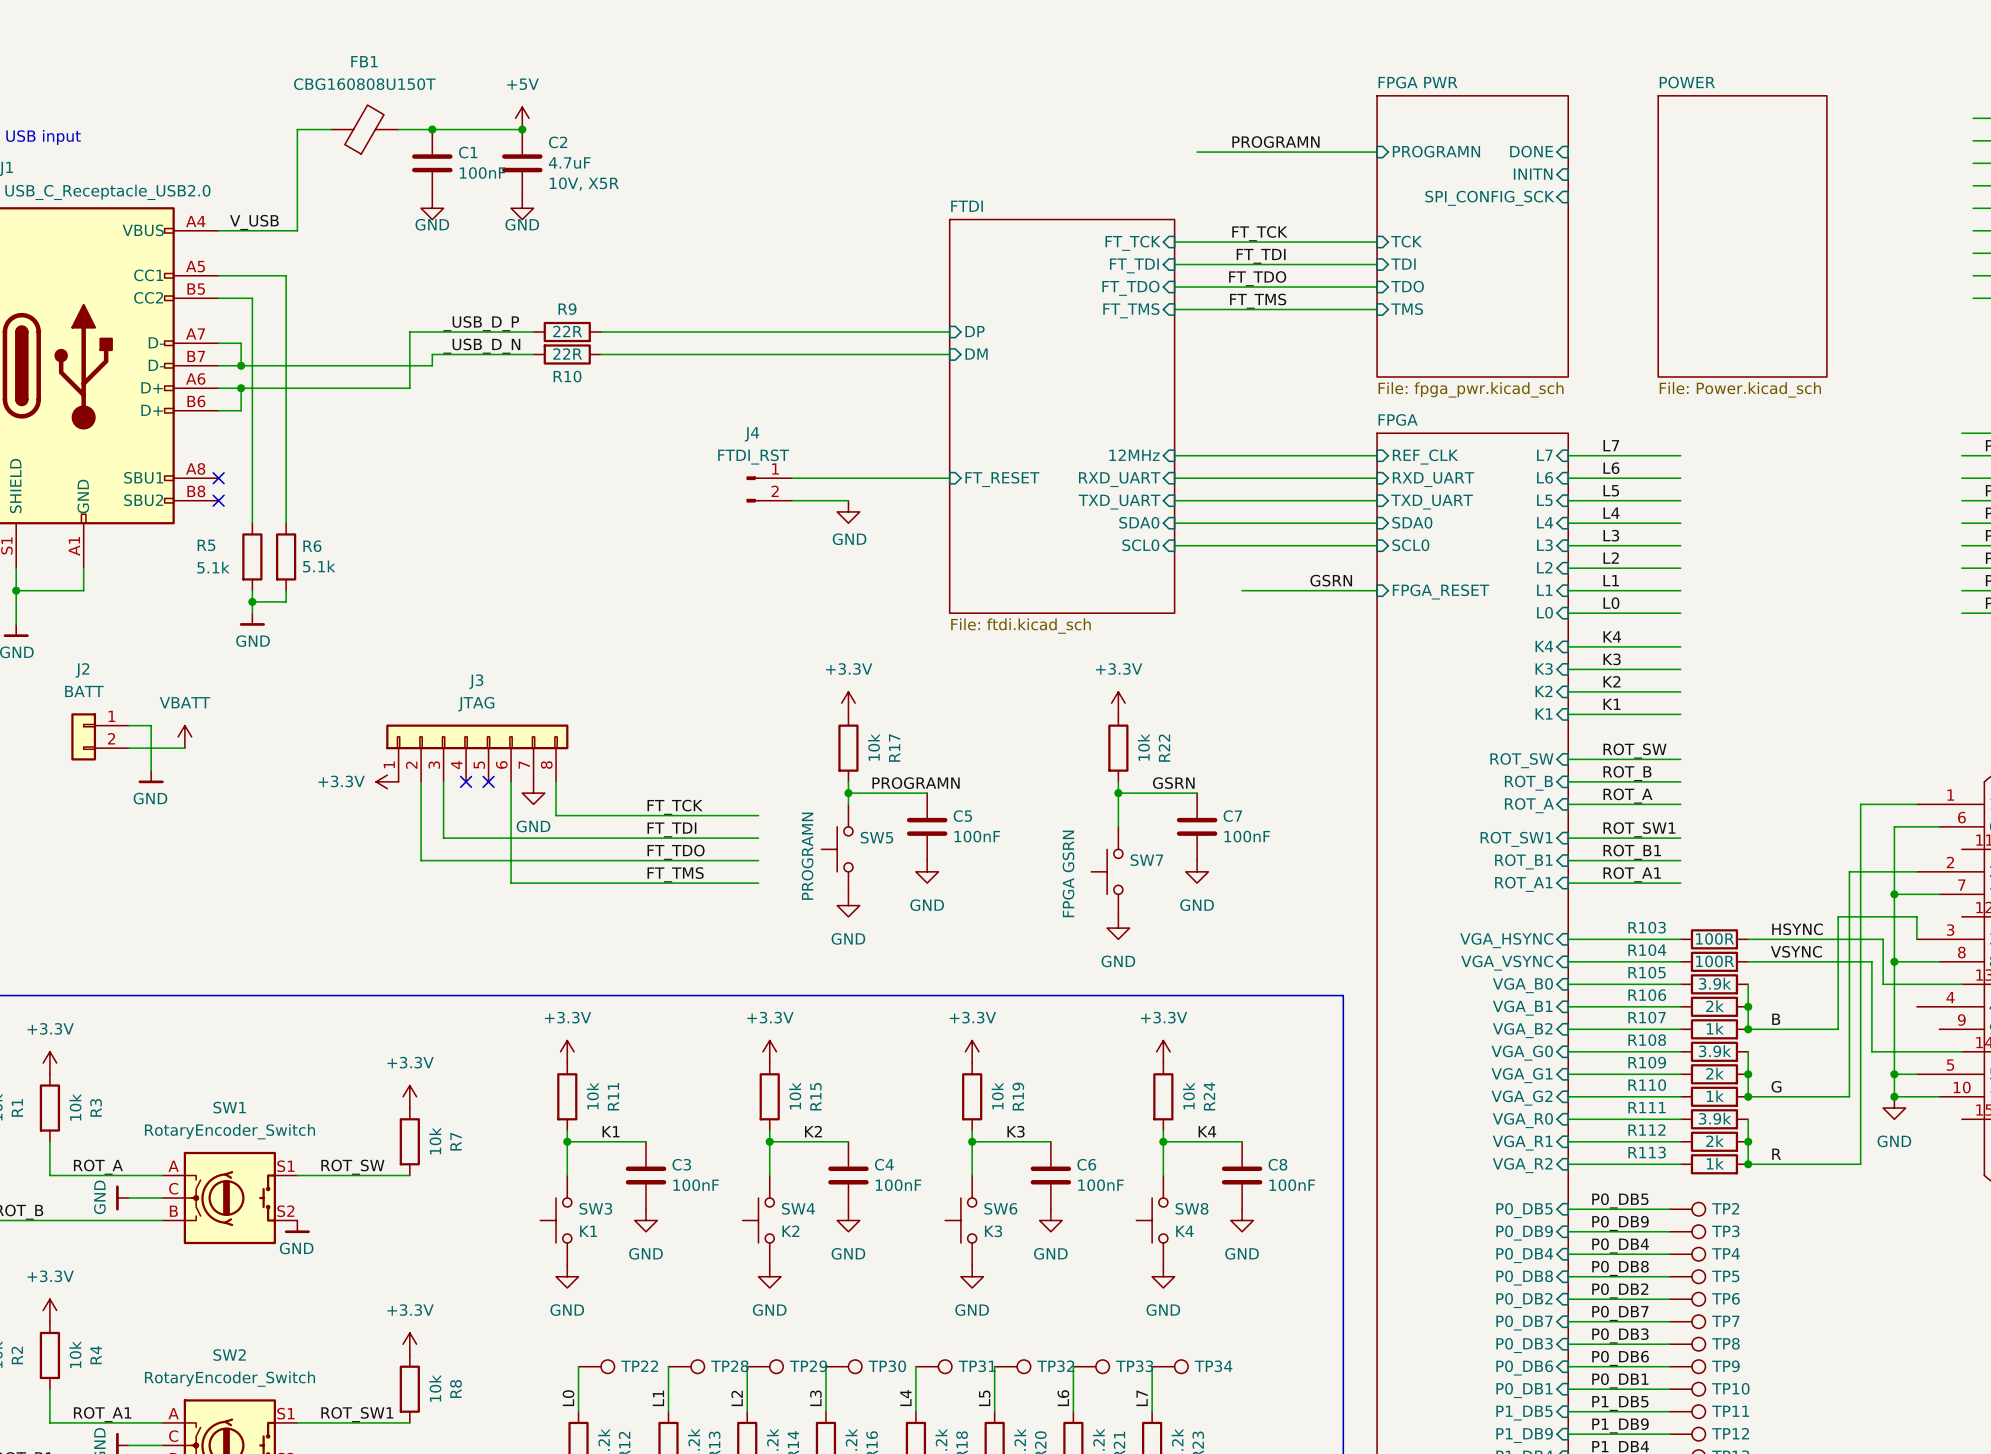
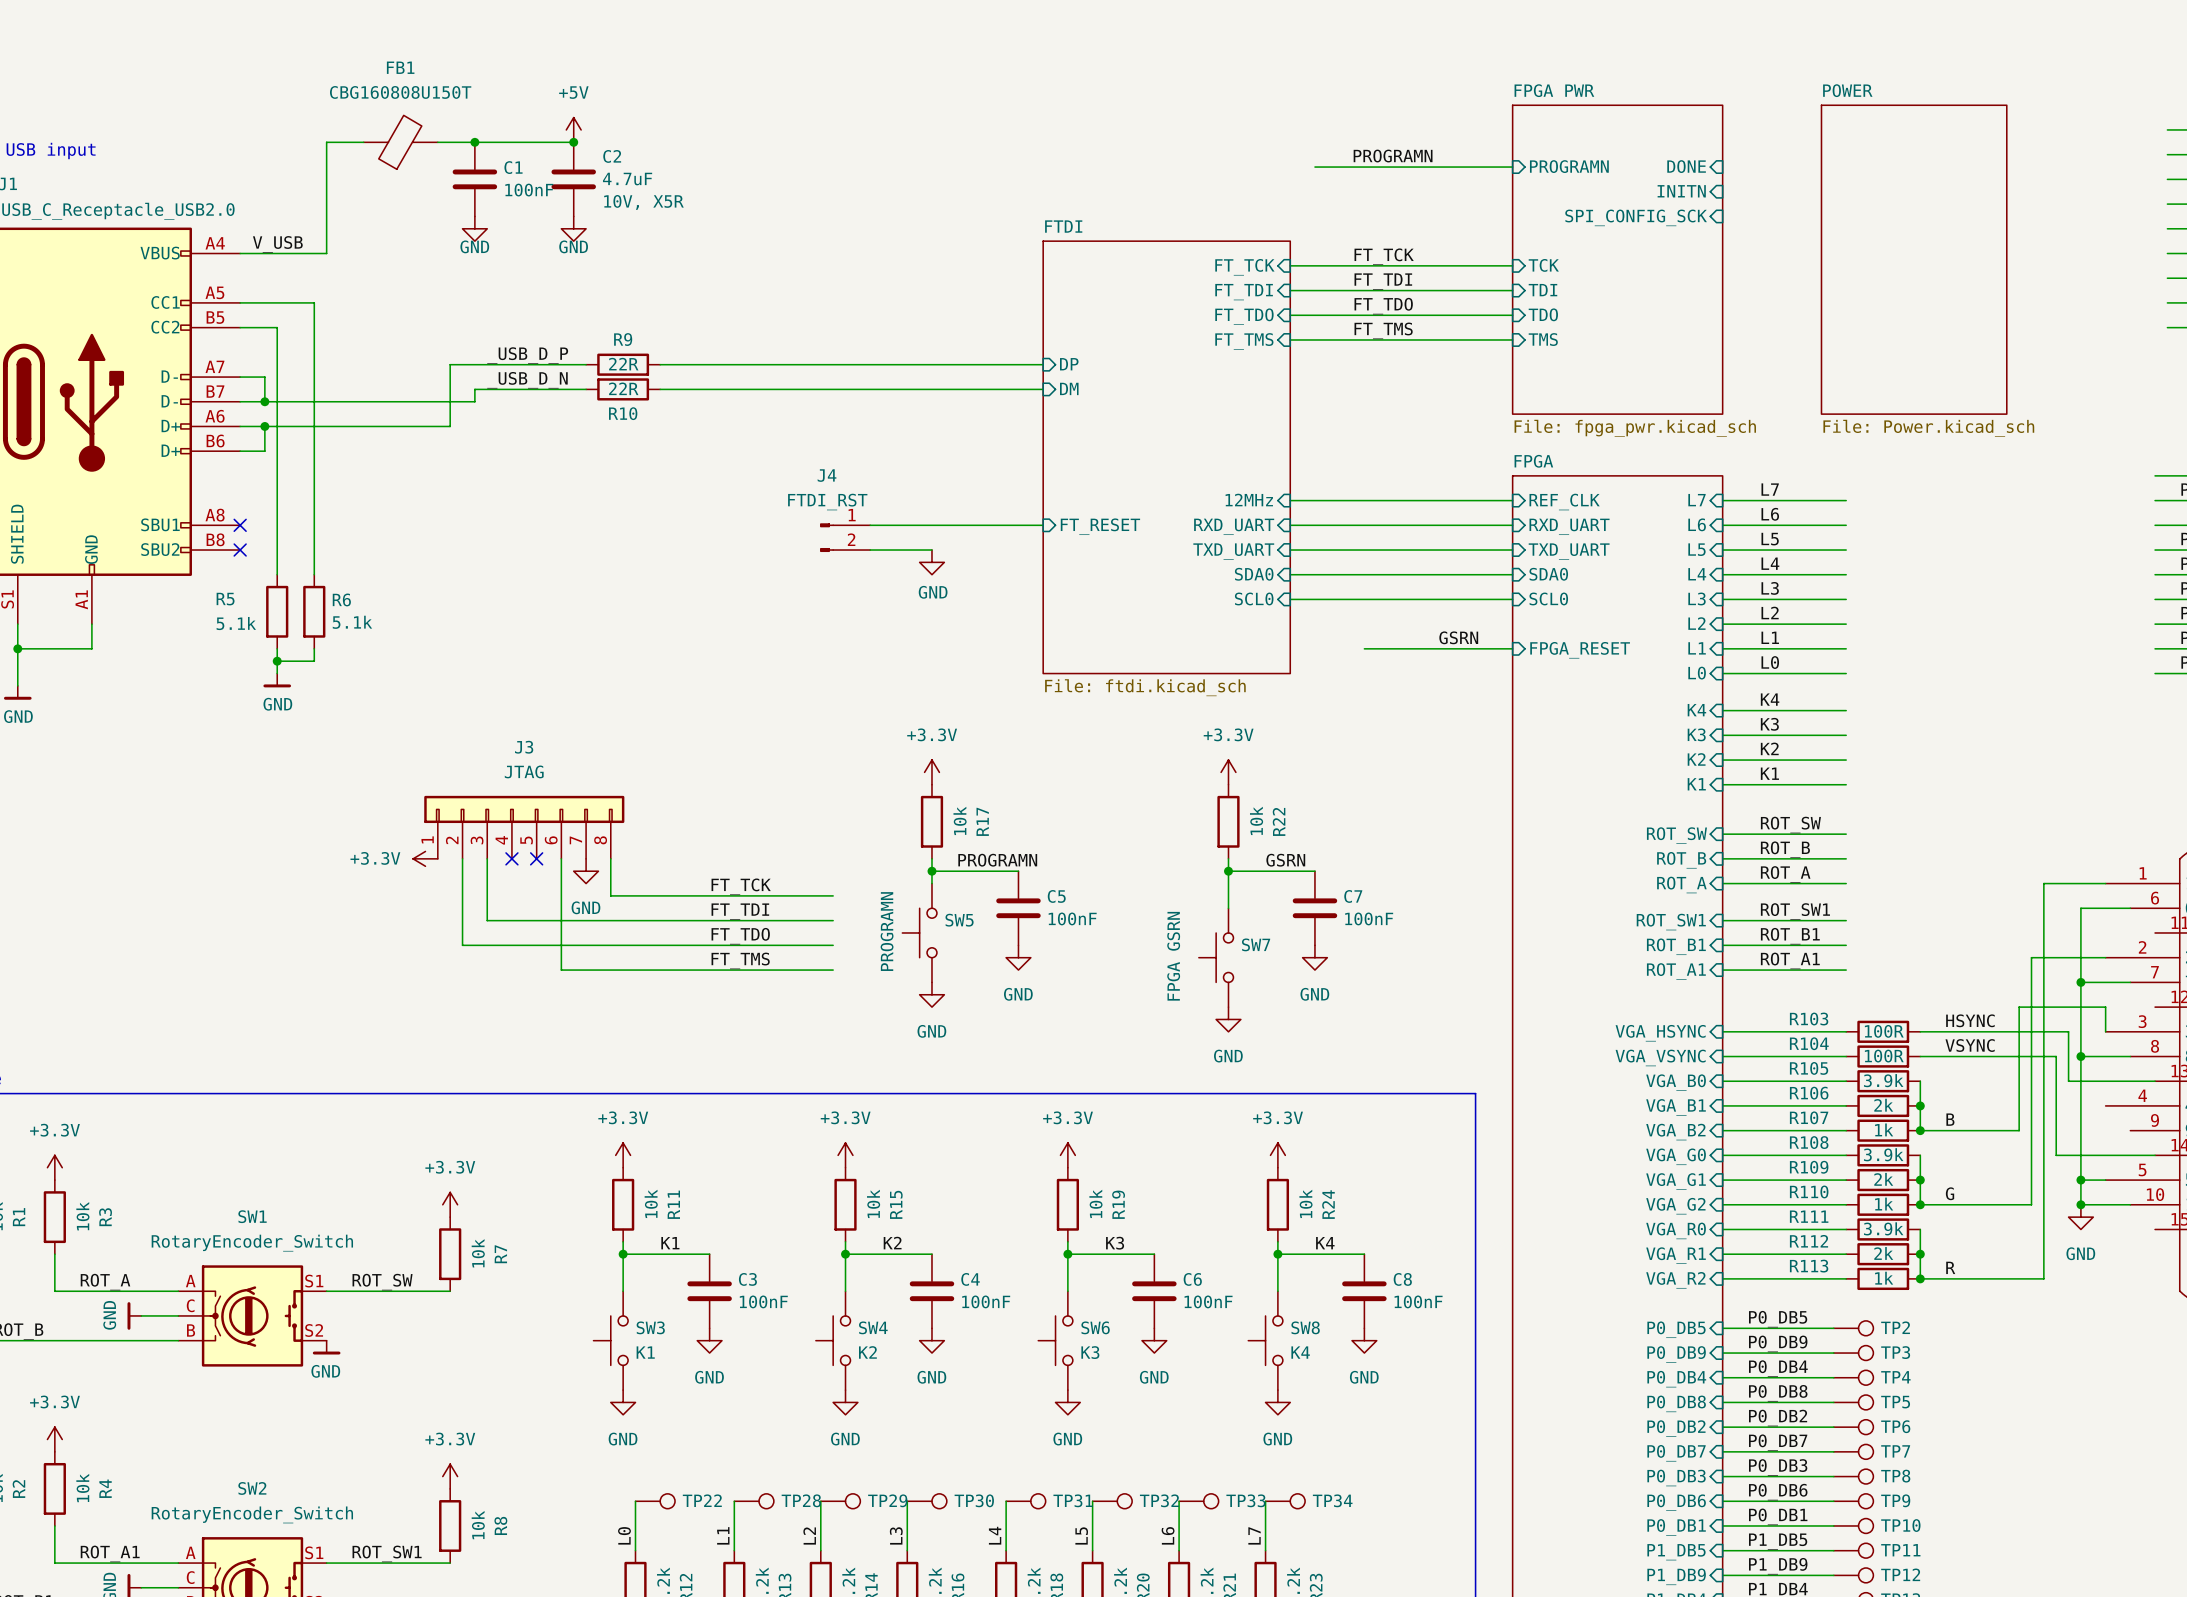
wire: (128, 725) (151, 725) (151, 770) -> none
J2: BATT (99, 736) -> none
power symbol: VBATT (184, 736) -> none
wire: (128, 748) (184, 748) -> none
power symbol: GND (151, 776) -> none

